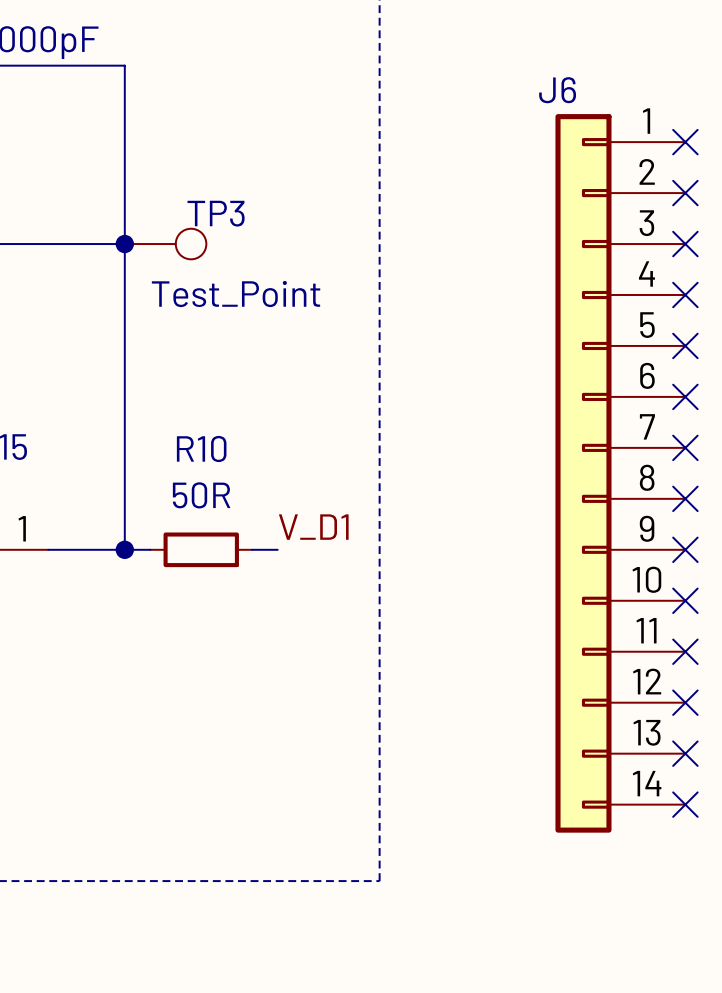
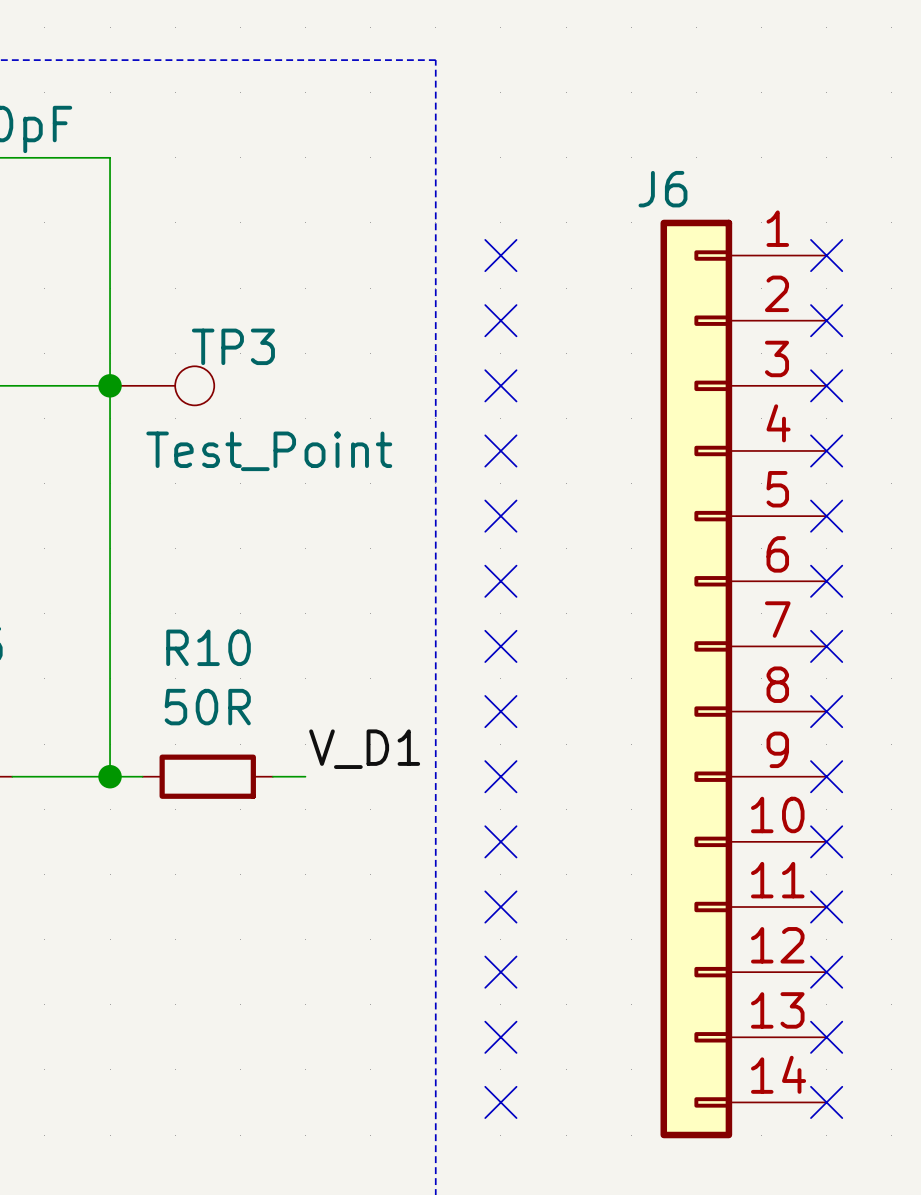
no-connect mark: none -> (500, 255)
no-connect mark: none -> (500, 320)
no-connect mark: none -> (500, 385)
no-connect mark: none -> (500, 450)
no-connect mark: none -> (500, 516)
no-connect mark: none -> (500, 581)
no-connect mark: none -> (500, 646)
no-connect mark: none -> (500, 711)
no-connect mark: none -> (500, 776)
no-connect mark: none -> (500, 841)
no-connect mark: none -> (500, 907)
no-connect mark: none -> (500, 972)
no-connect mark: none -> (500, 1037)
no-connect mark: none -> (500, 1102)

